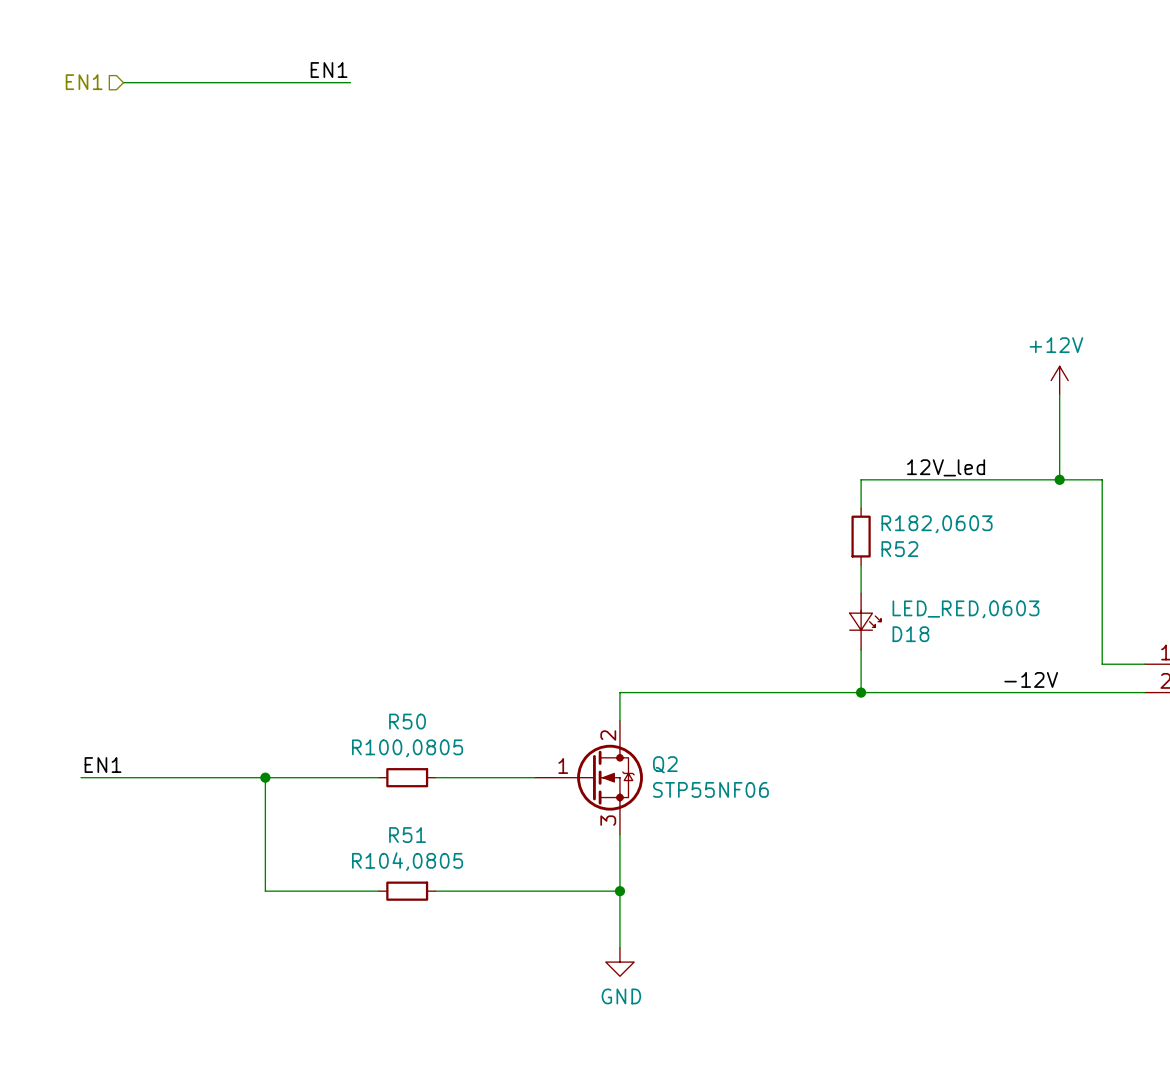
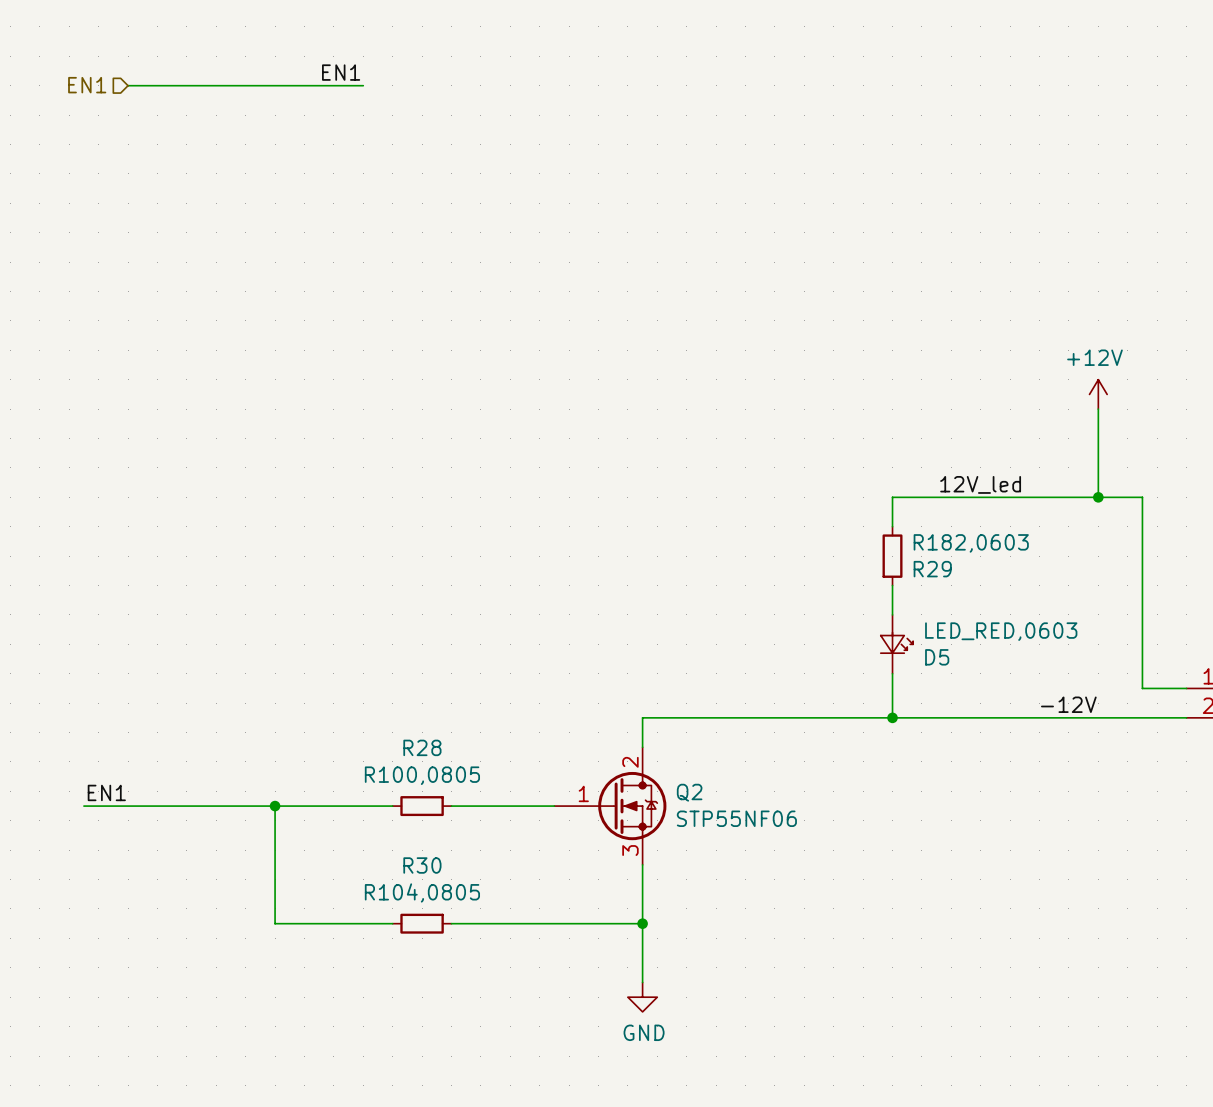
R52 name: R52 (899, 549) -> R29 (932, 569)
D18 name: D18 (910, 634) -> D5 (937, 657)
R50 name: R50 (407, 721) -> R28 (422, 747)
R51 name: R51 (407, 835) -> R30 (422, 865)

